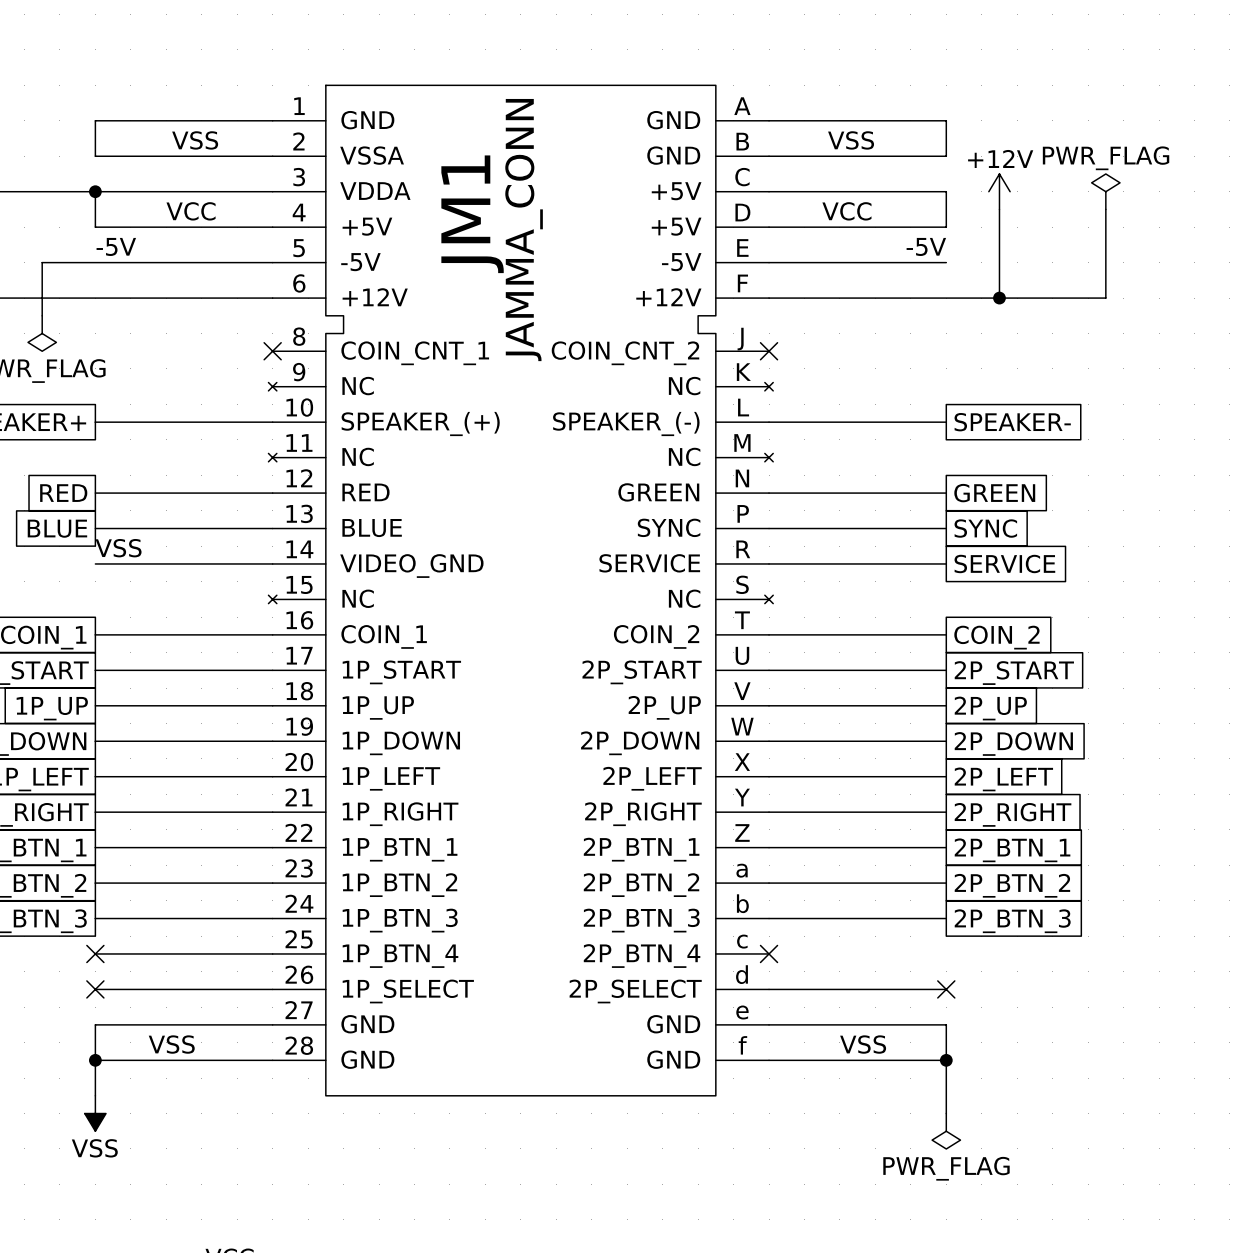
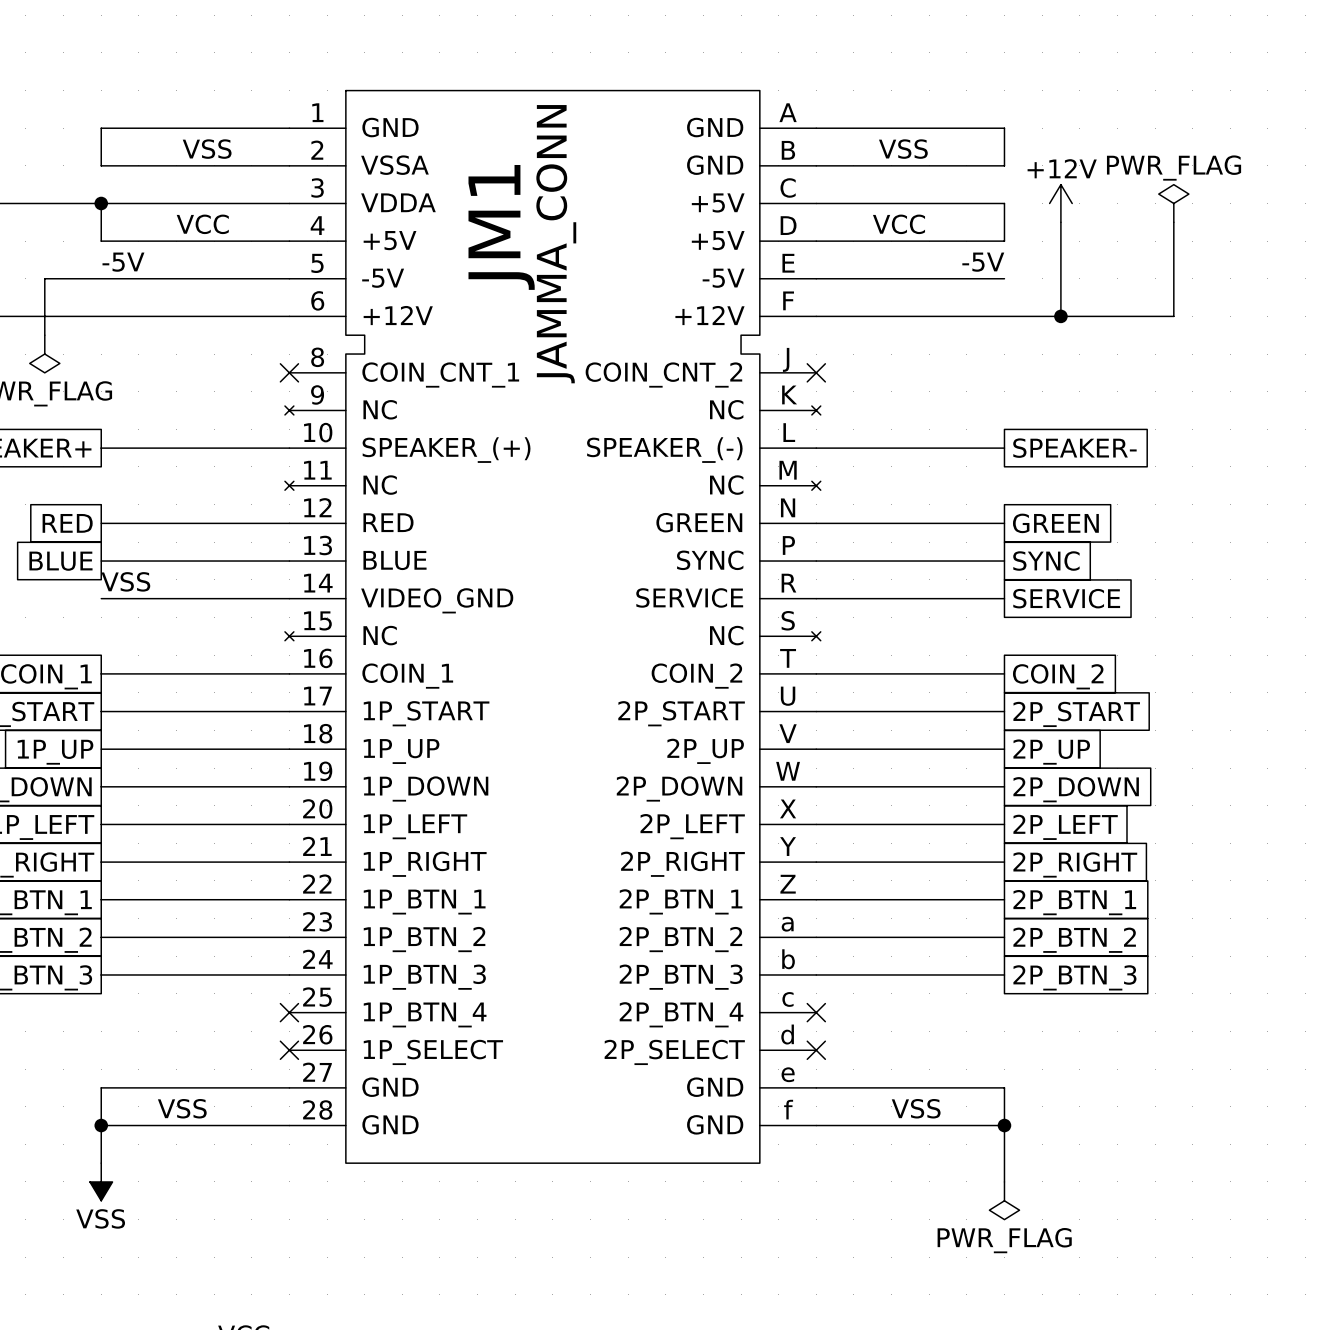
wire: (95, 953) (272, 953) -> none
no-connect mark: (95, 953) -> none
no-connect mark: none -> (289, 1012)
wire: (95, 989) (272, 989) -> none
no-connect mark: (95, 989) -> none
no-connect mark: none -> (289, 1050)
wire: (769, 989) (946, 989) -> none
no-connect mark: none -> (816, 1050)
no-connect mark: (946, 989) -> none

